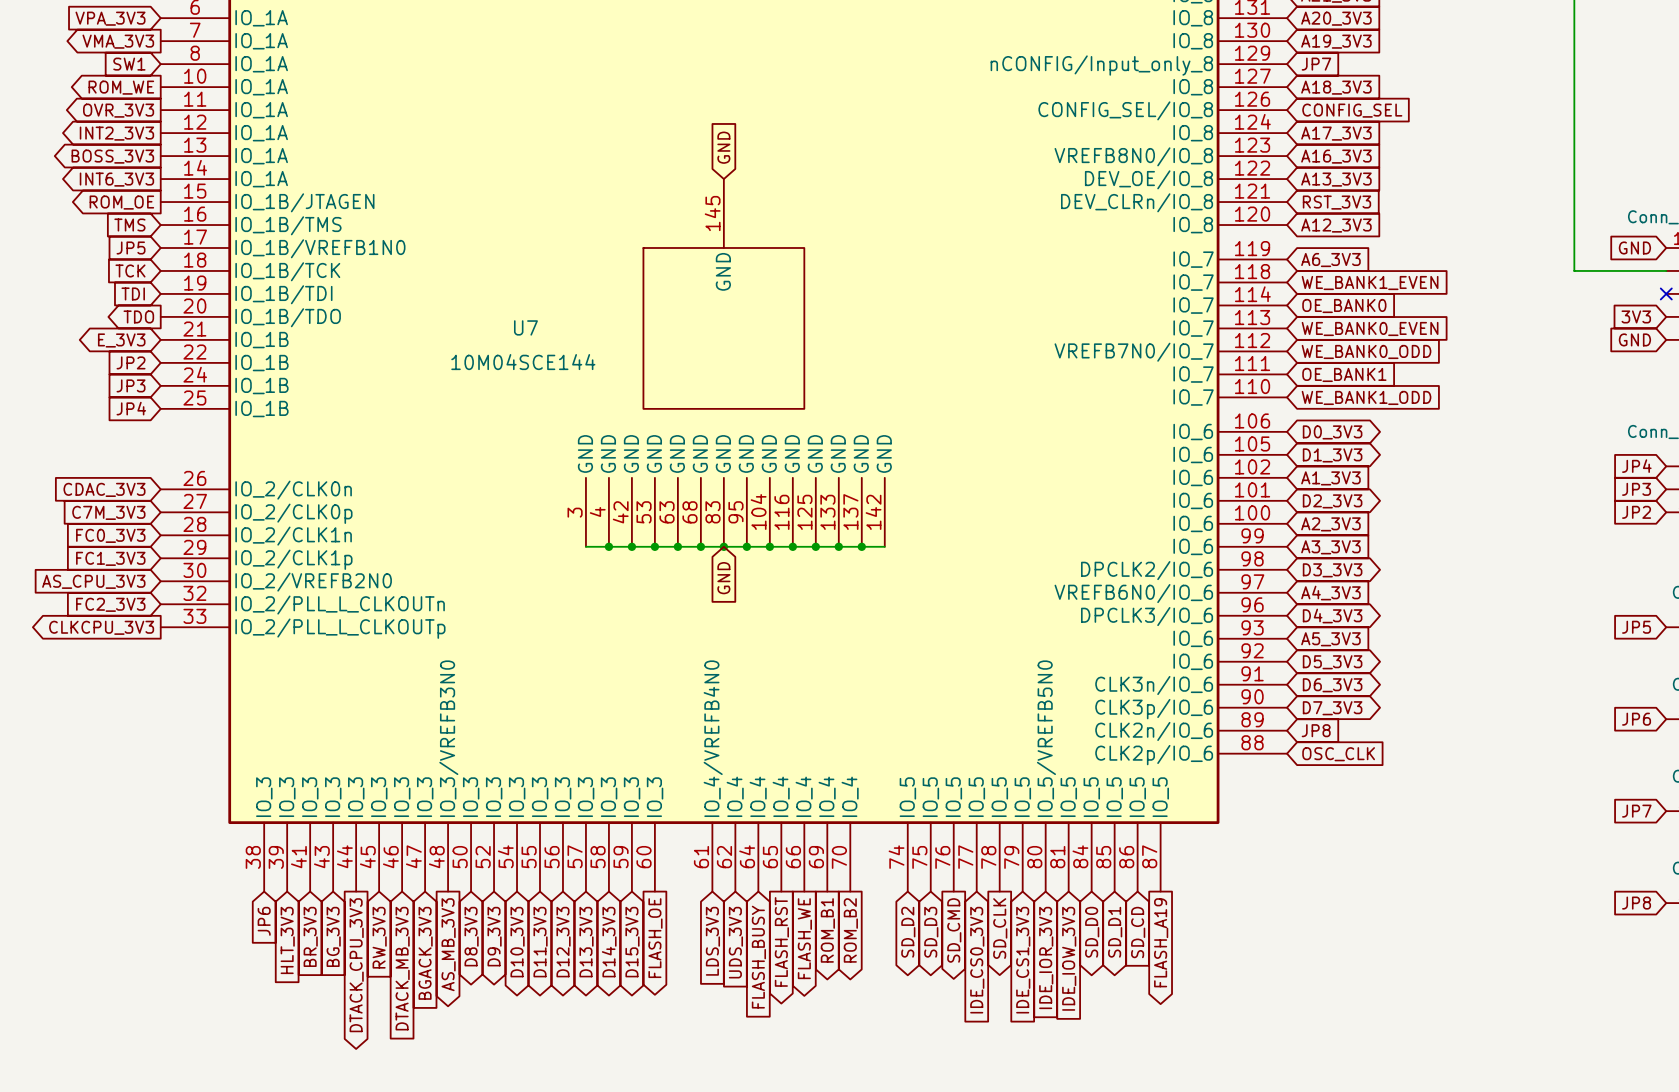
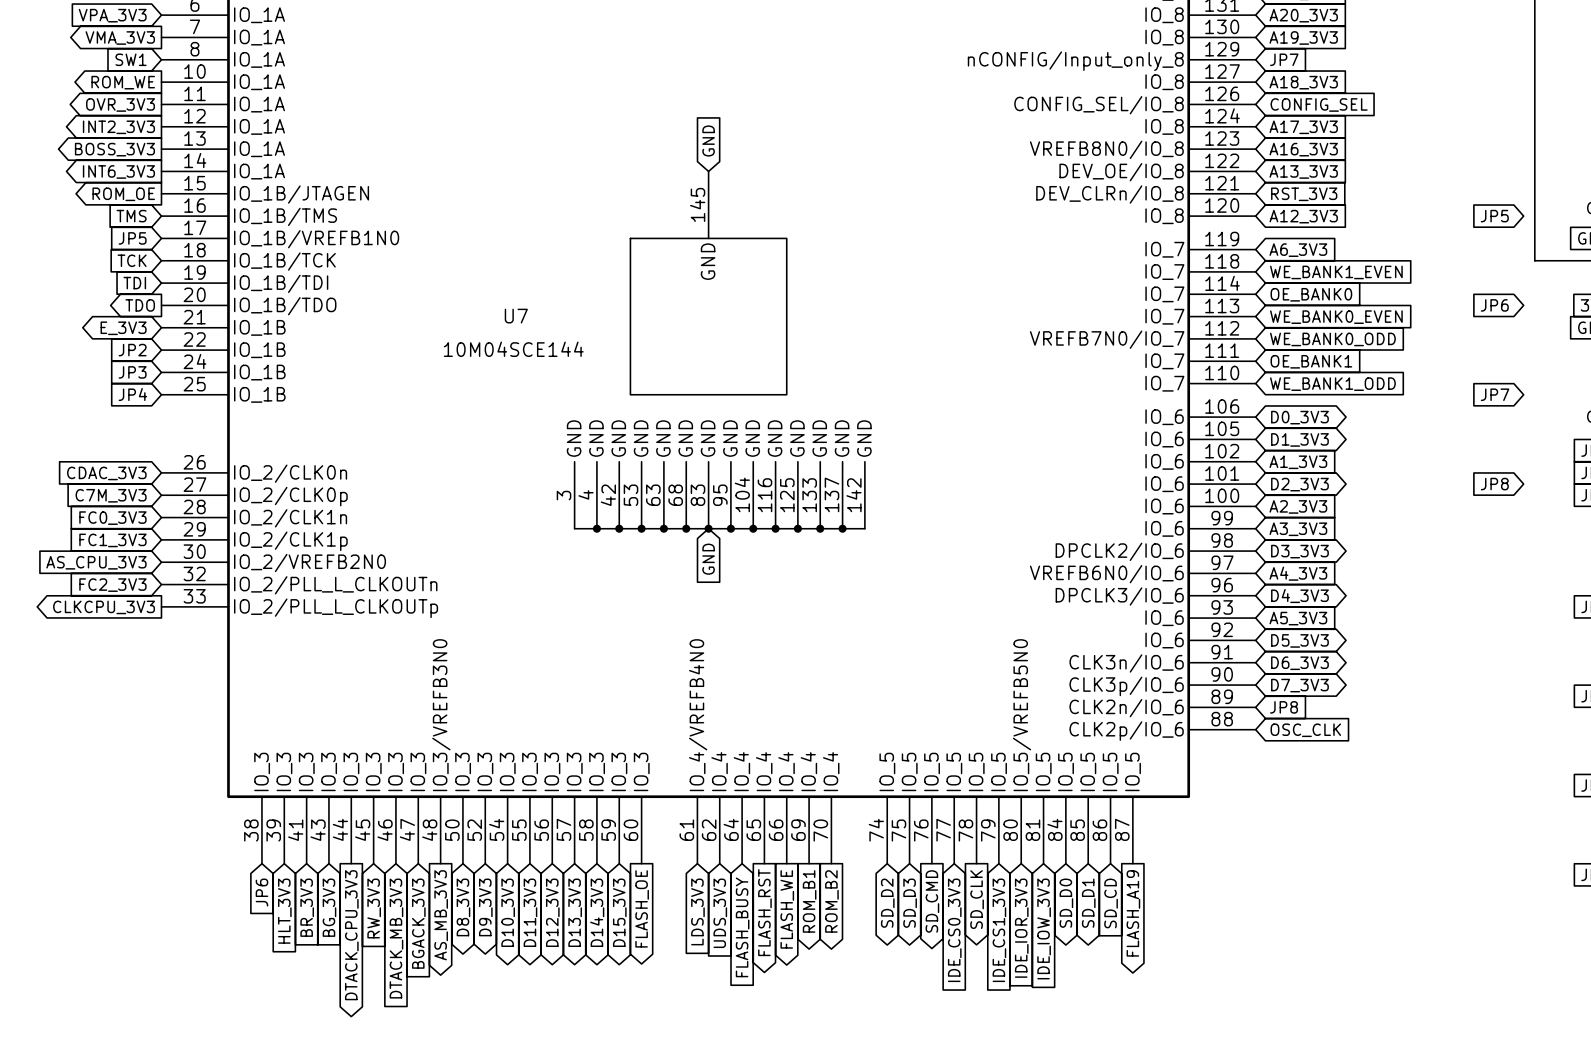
global label: none -> JP5 (1494, 216)
global label: none -> JP6 (1494, 305)
global label: none -> JP7 (1495, 394)
global label: none -> JP8 (1494, 484)

